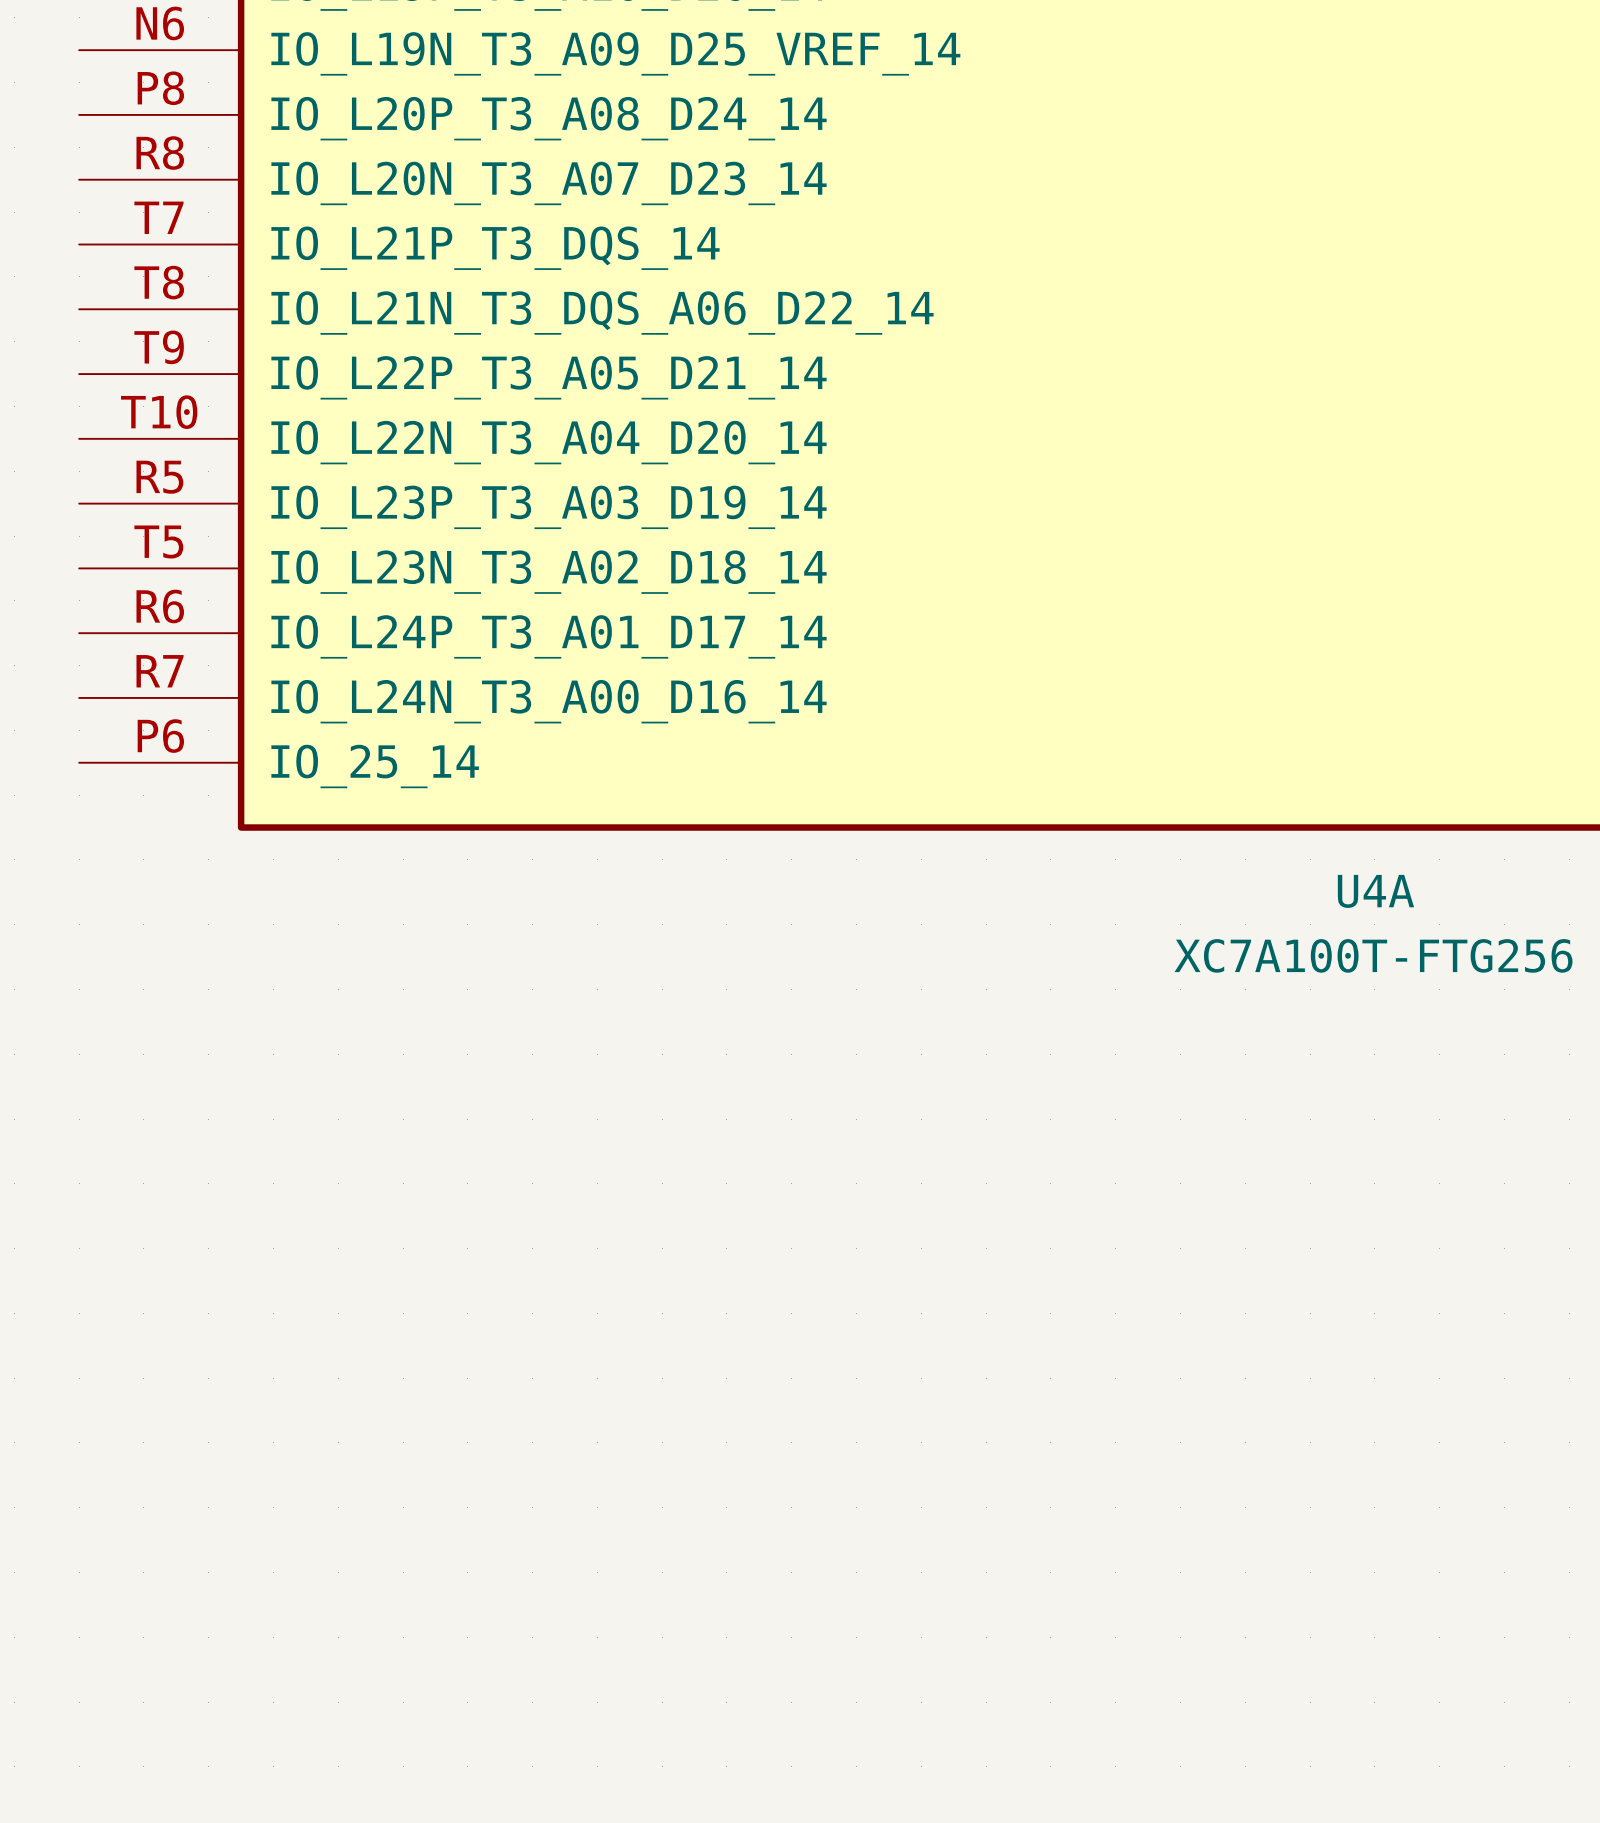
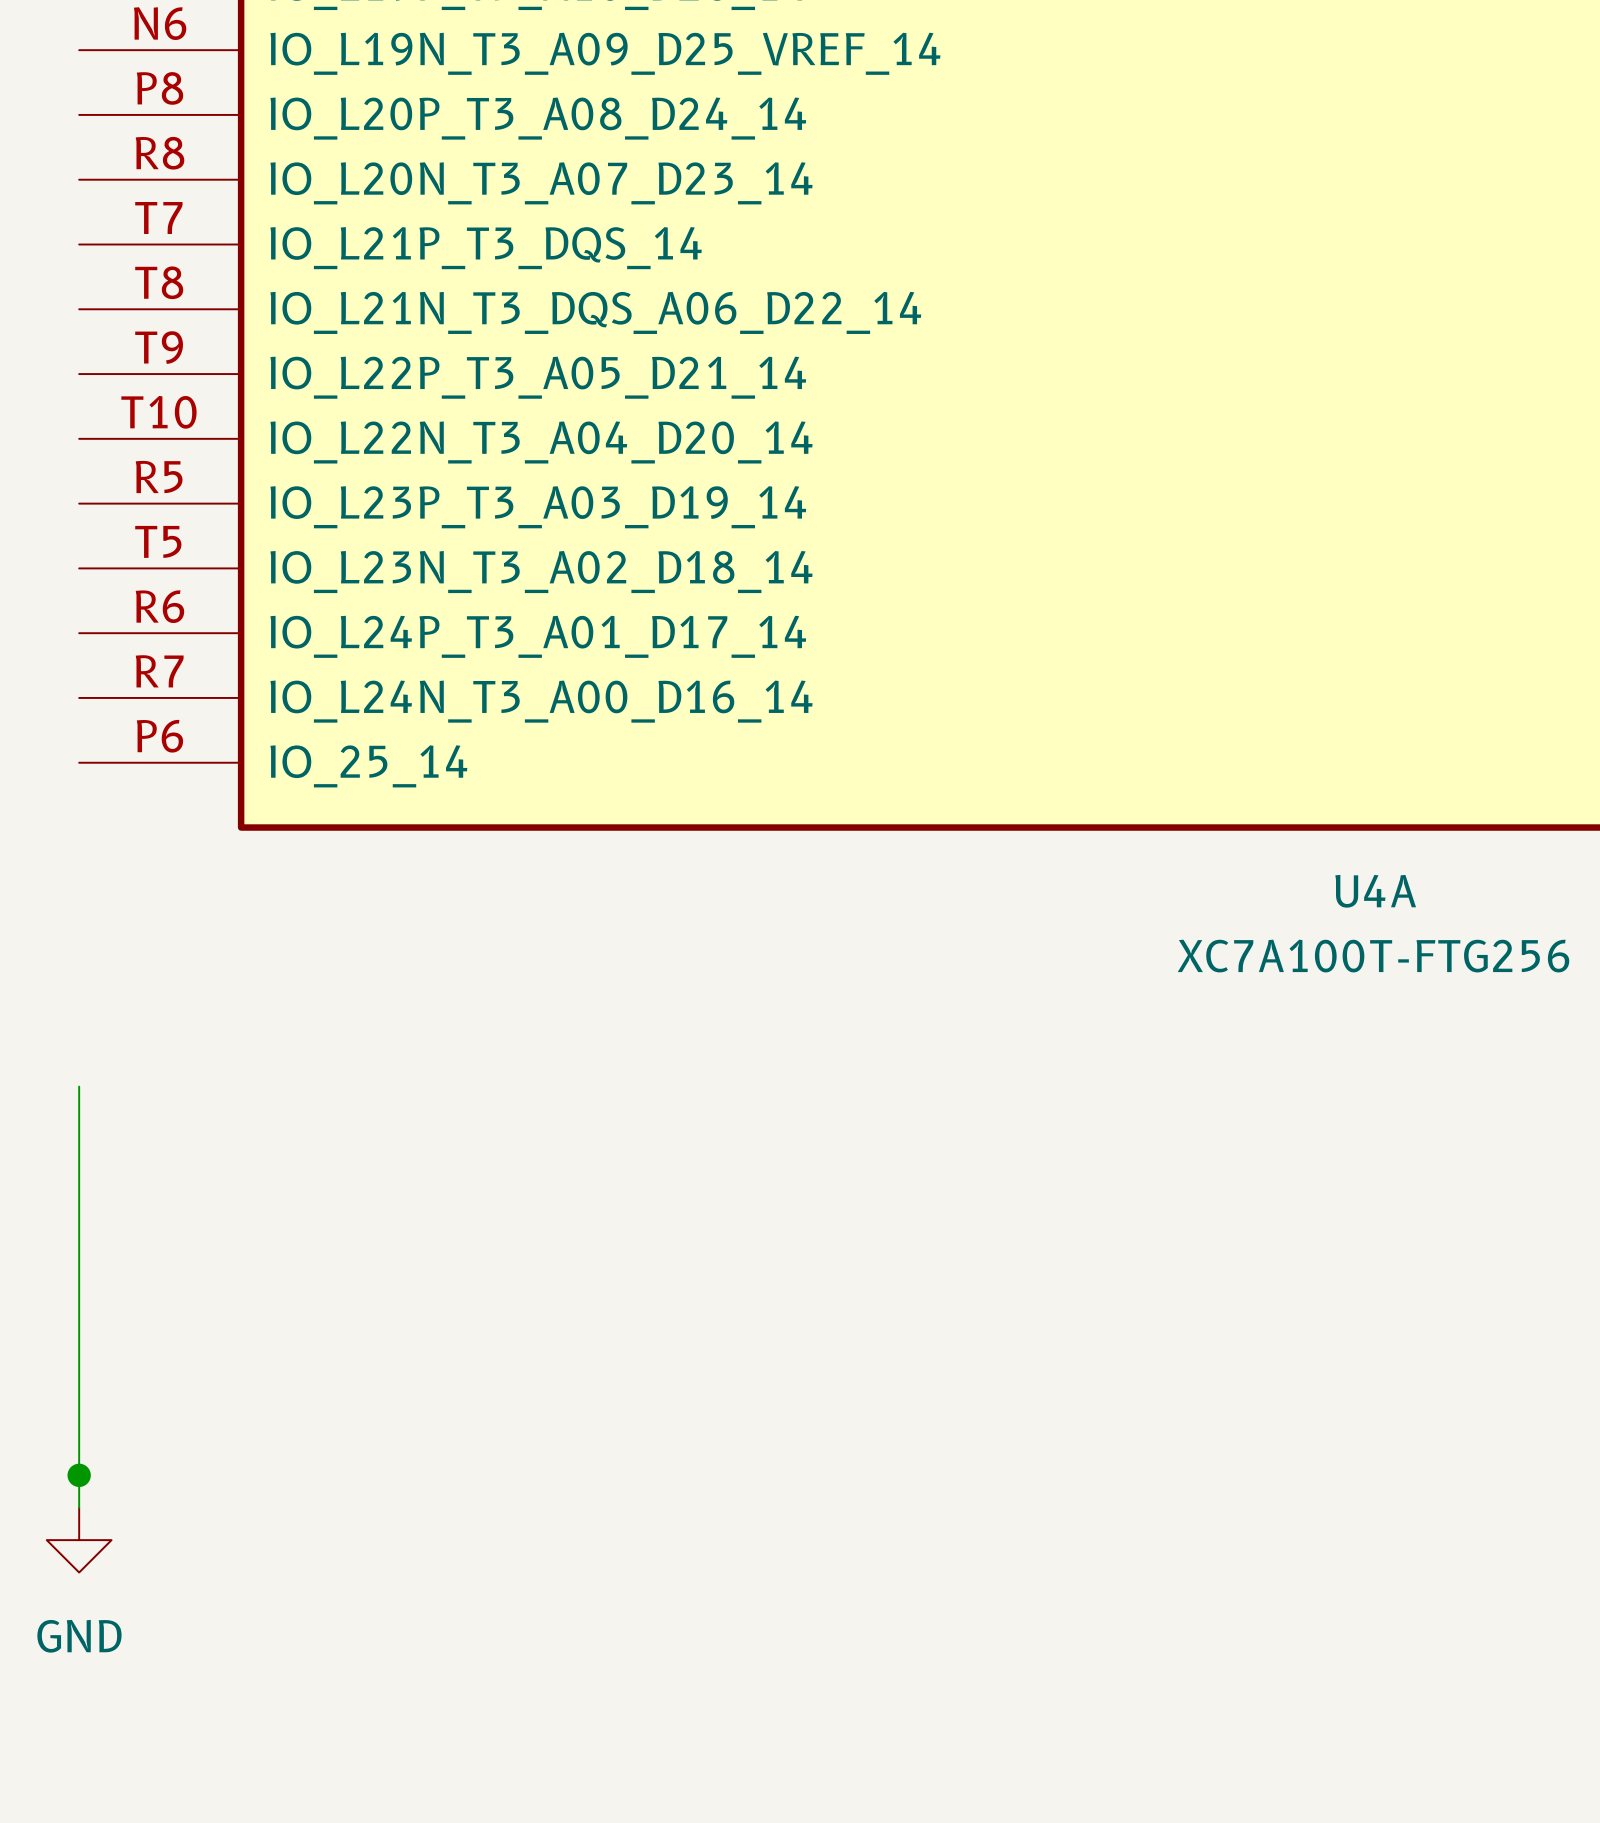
wire: none -> (79, 1086) (79, 1507)
junction: none -> (79, 1475)
power symbol: none -> GND (79, 1540)

